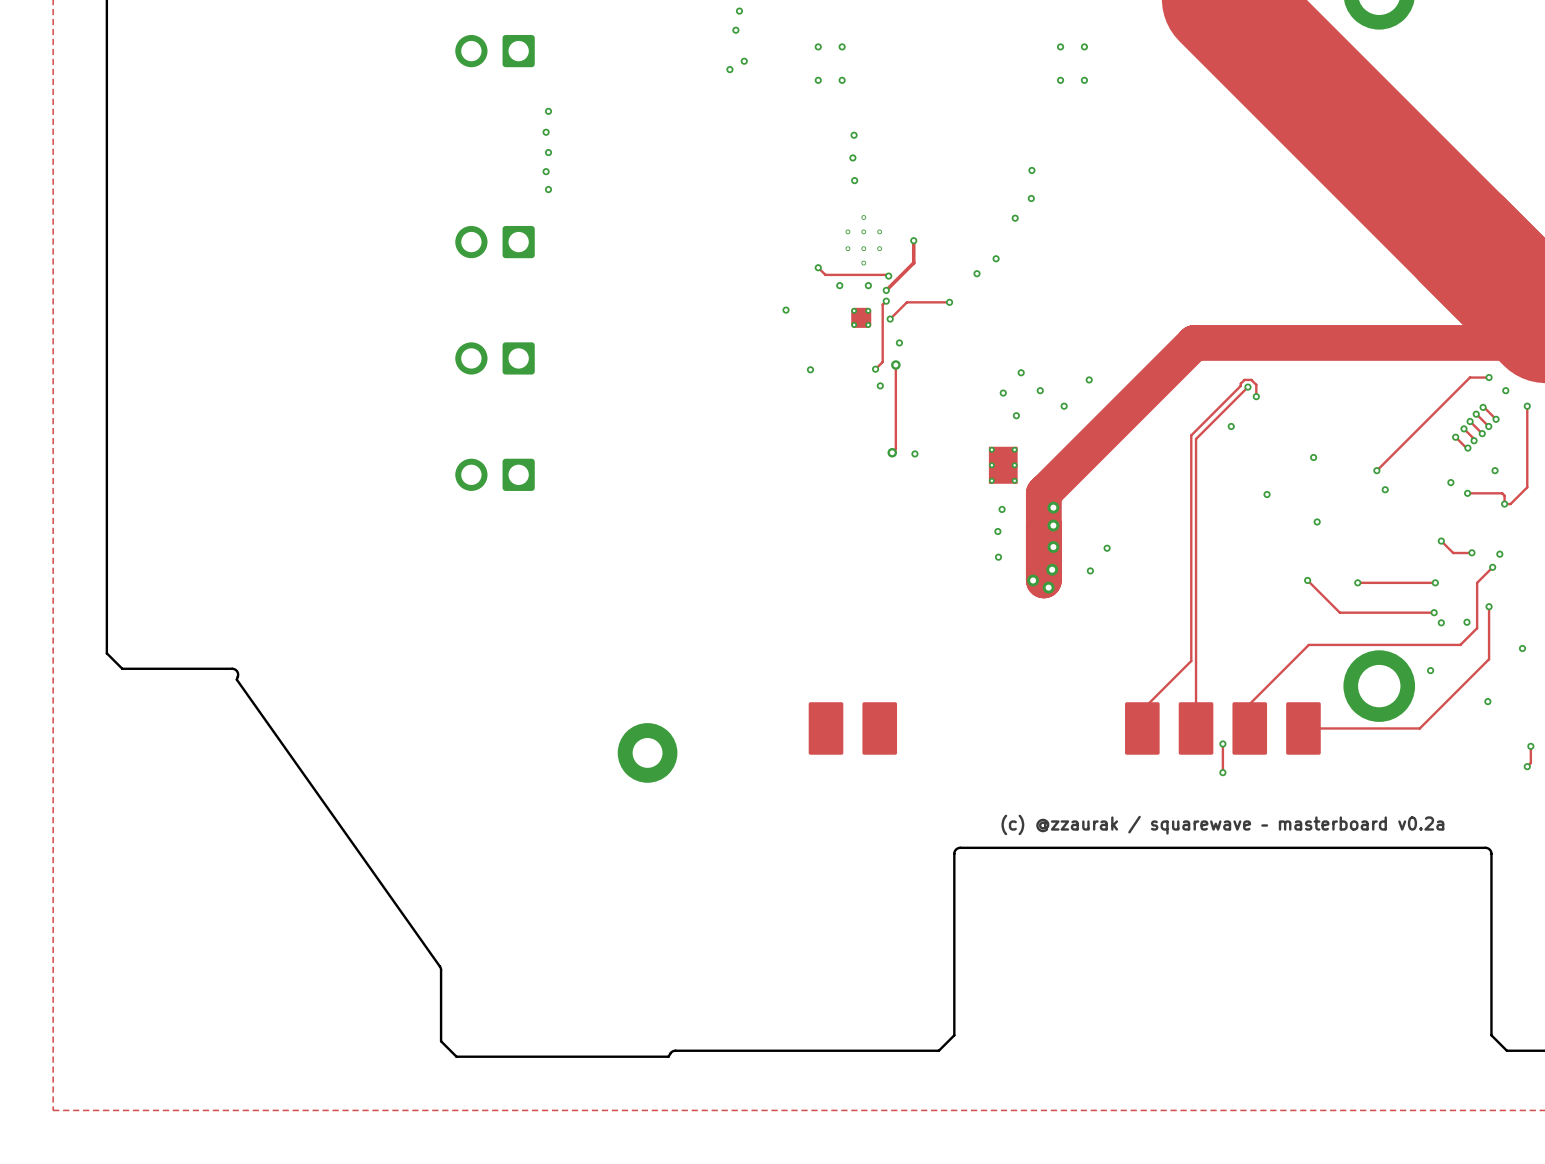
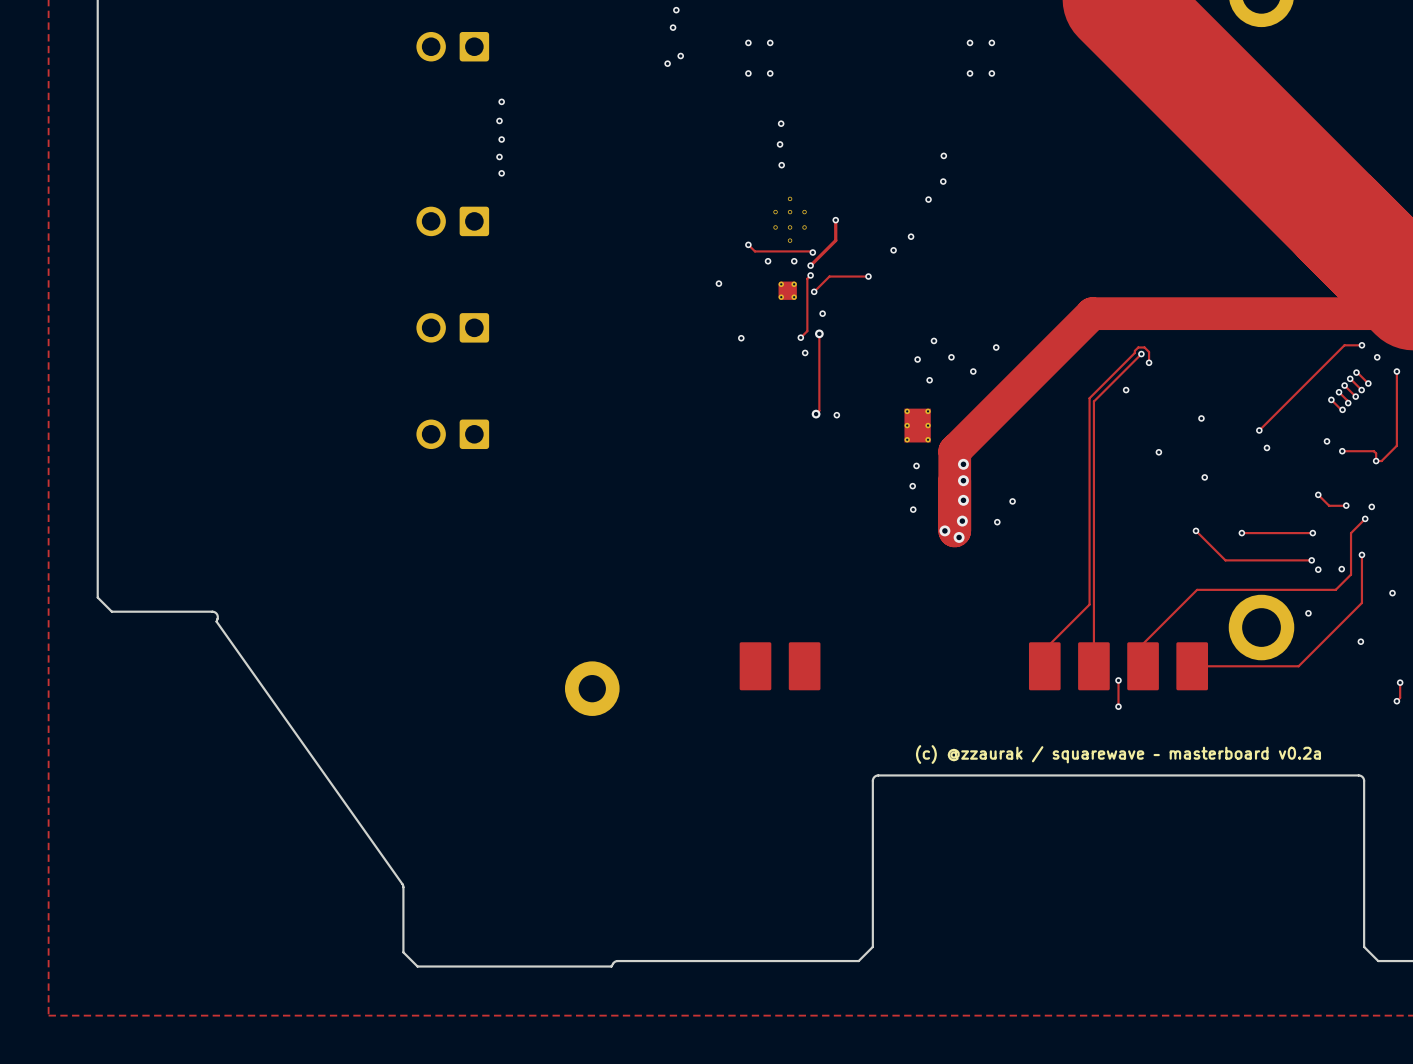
via: (1495, 470) -> none

